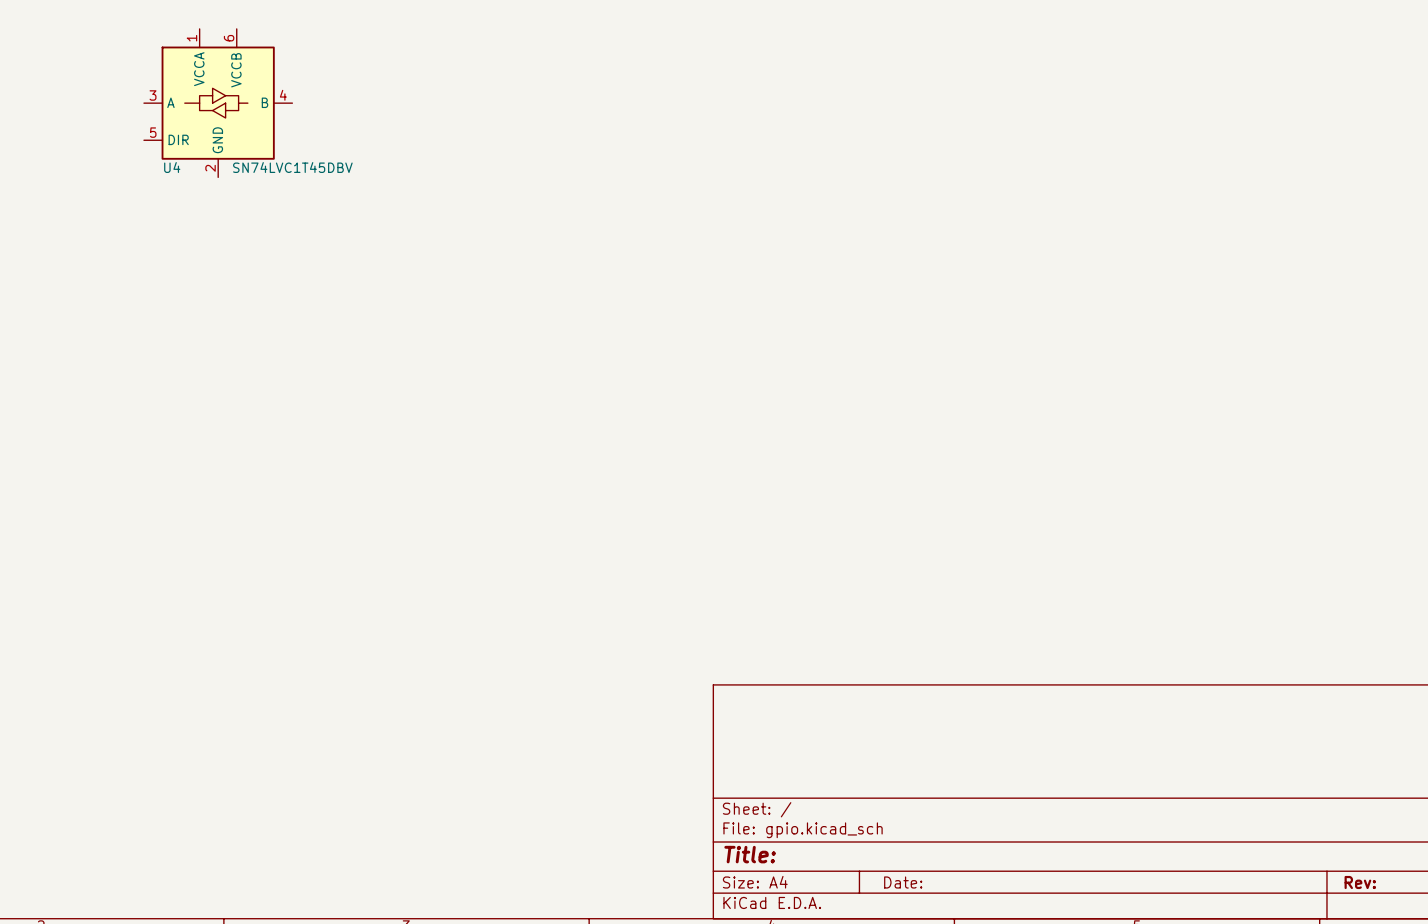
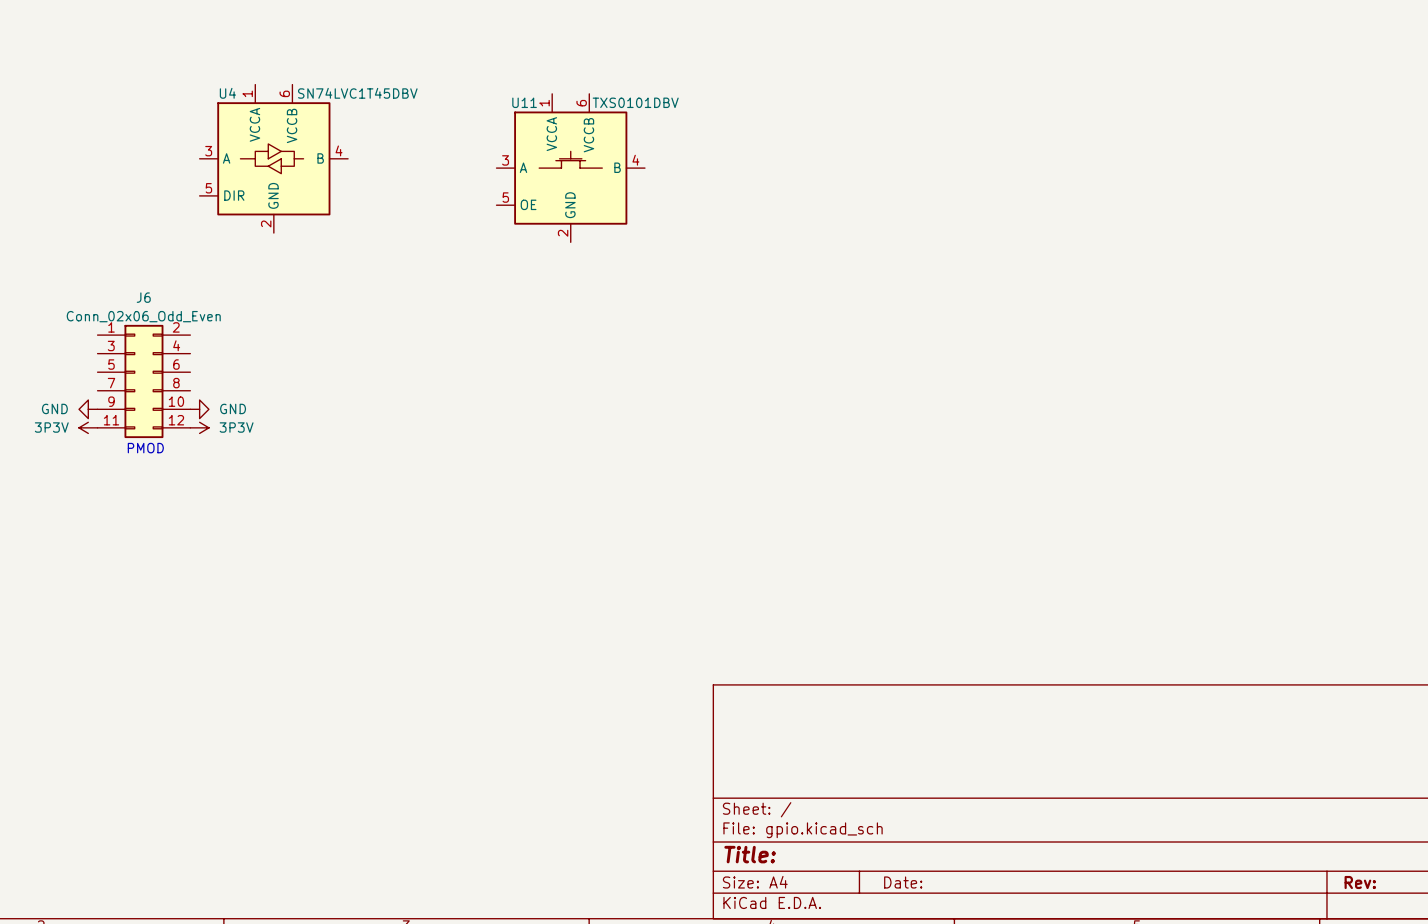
U4 position: (218, 103) -> (273, 158)
U4 name position: U4 (172, 167) -> U4 (227, 93)
U4 value position: SN74LVC1T45DBV (292, 167) -> SN74LVC1T45DBV (357, 93)
U11: none -> TXS0101DBV (570, 168)
J6: none -> Conn_02x06_Odd_Even (143, 381)
power symbol: none -> GND (88, 409)
power symbol: none -> GND (199, 409)
power symbol: none -> 3P3V (88, 427)
power symbol: none -> 3P3V (199, 427)
text: none -> PMOD (145, 448)

